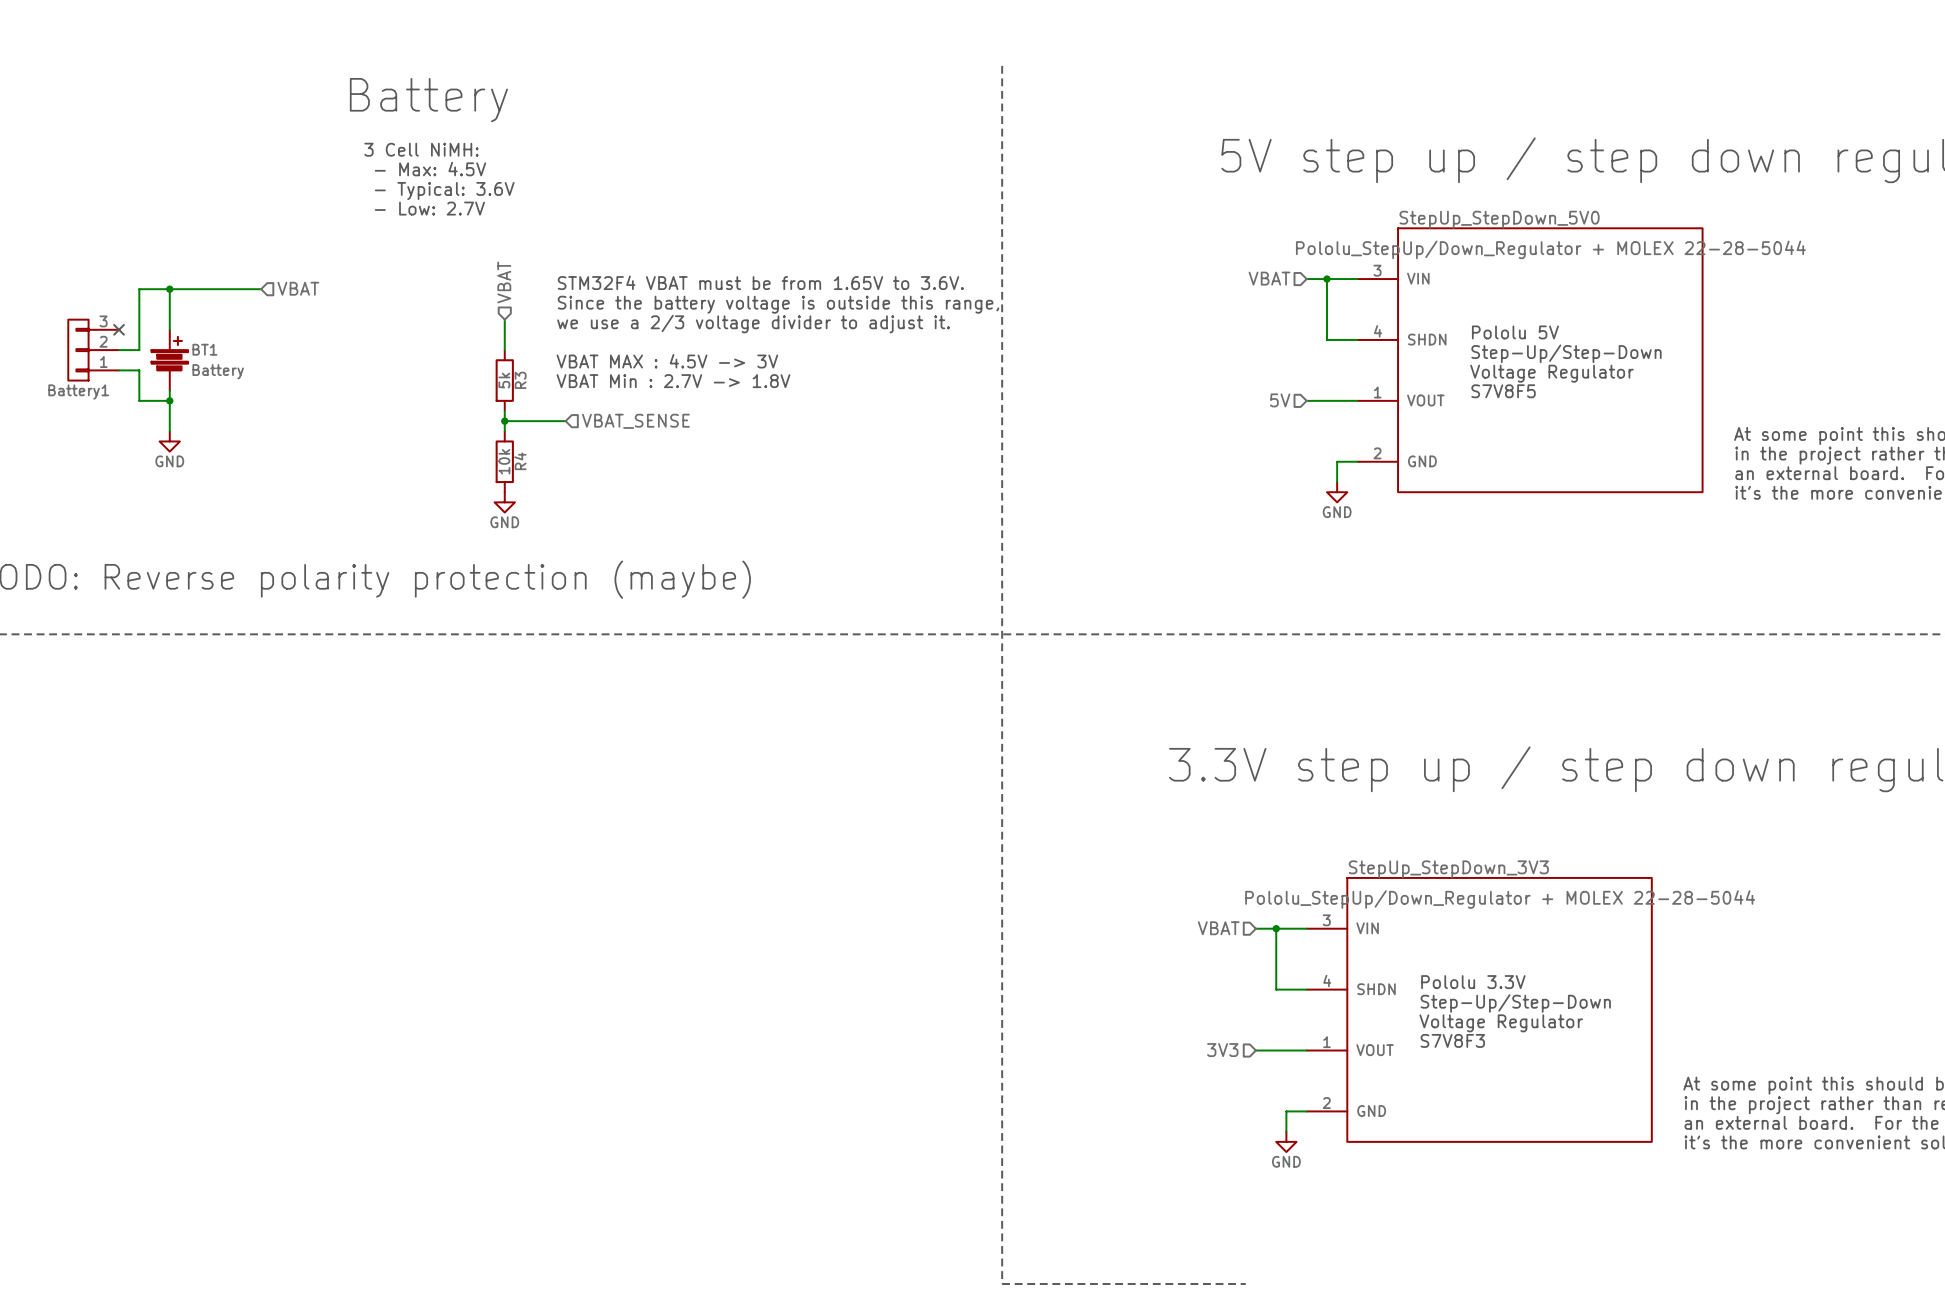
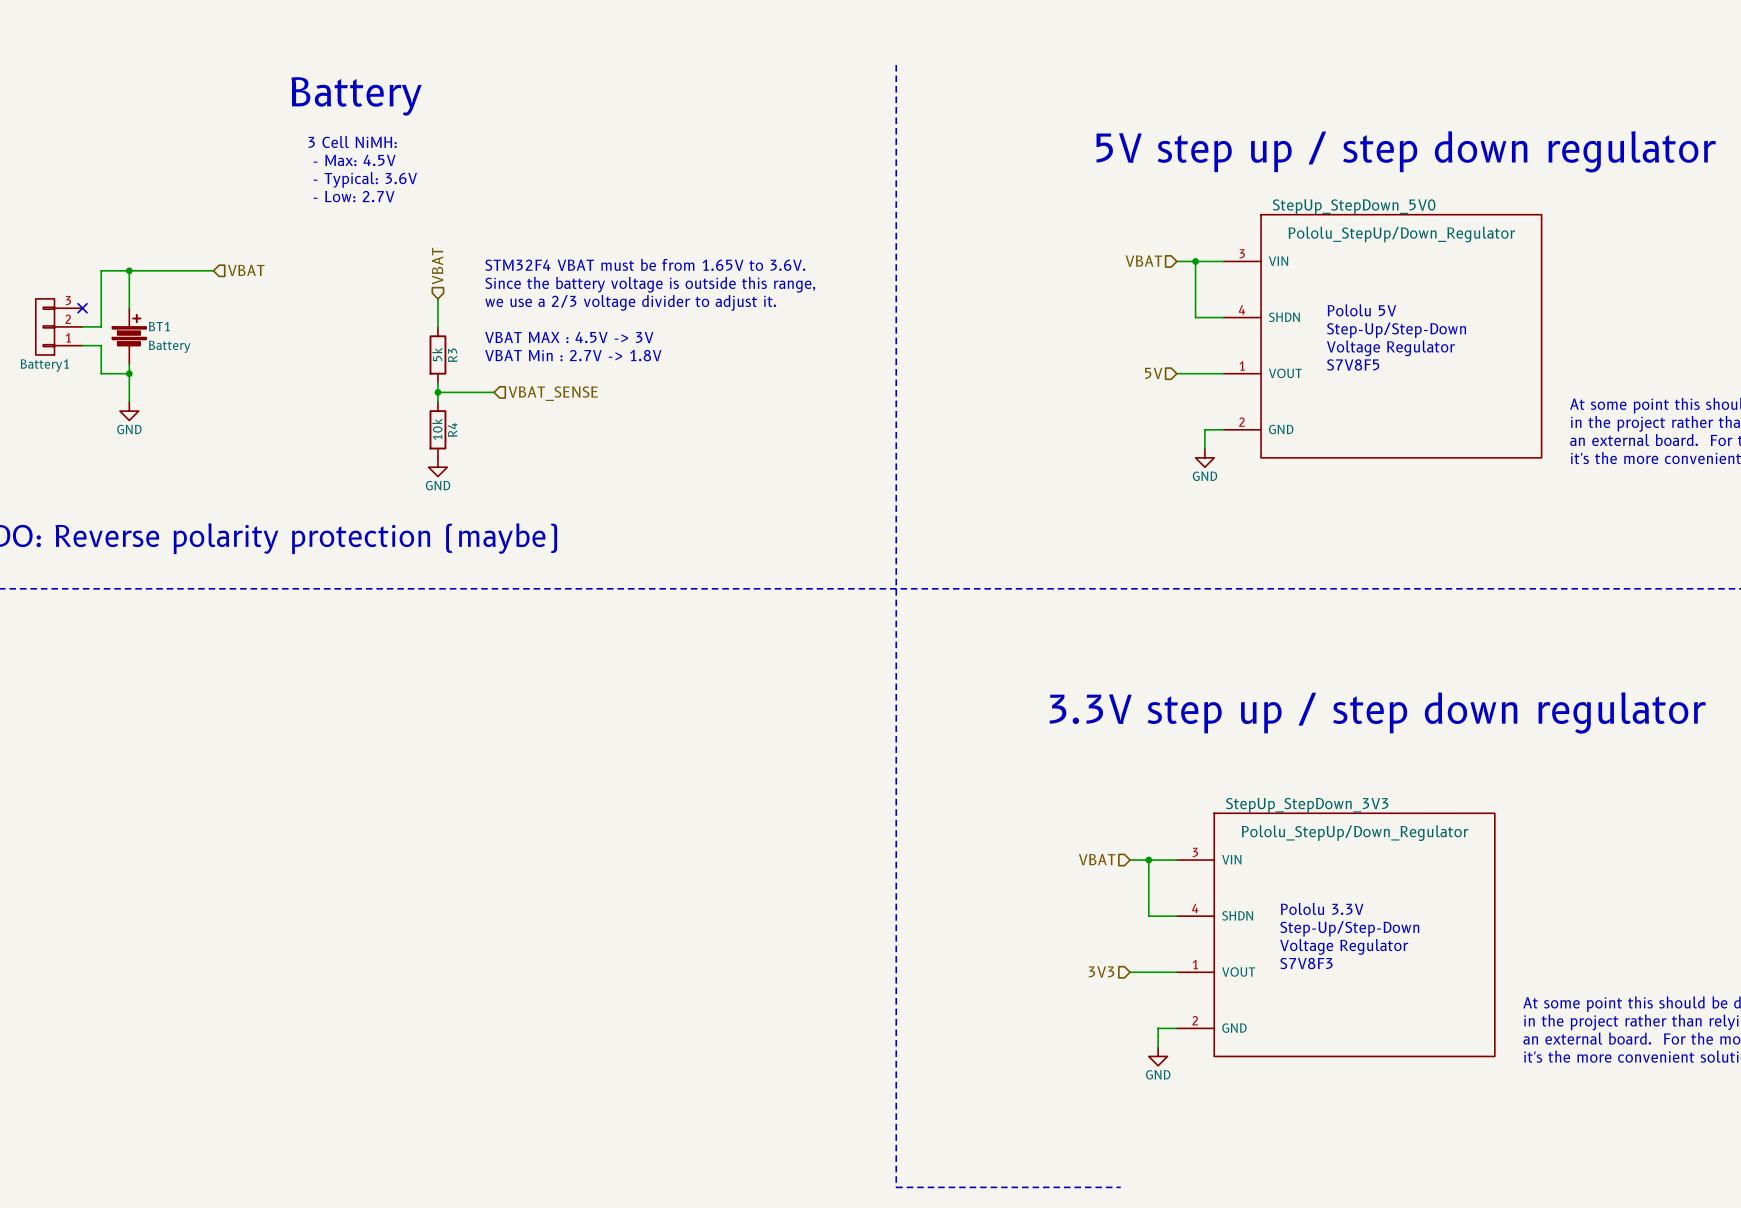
StepUp_StepDown_5V0 value: Pololu_StepUp/Down_Regulator + MOLEX 22-28-5044 (1550, 249) -> Pololu_StepUp/Down_Regulator (1401, 234)
StepUp_StepDown_3V3 value: Pololu_StepUp/Down_Regulator + MOLEX 22-28-5044 (1500, 899) -> Pololu_StepUp/Down_Regulator (1355, 833)

